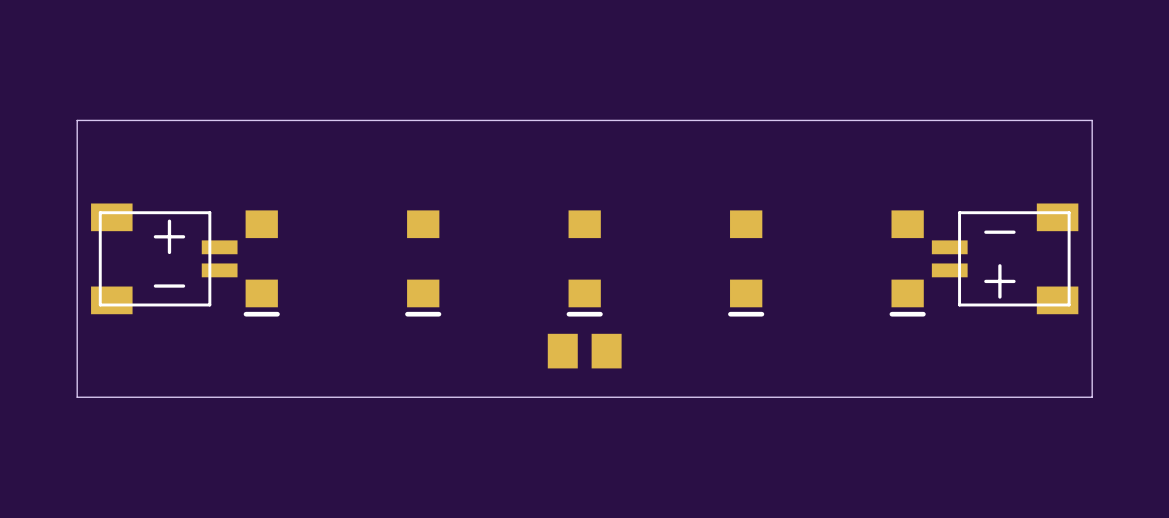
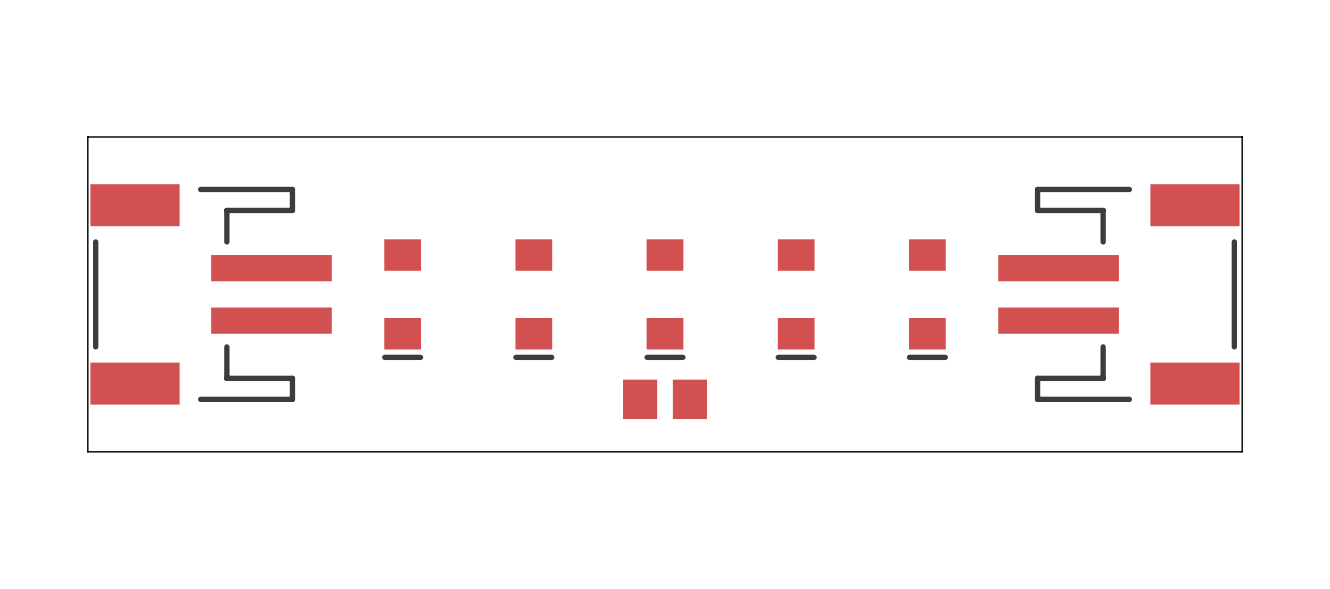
part footprint: [91, 203, 238, 315] -> [90, 184, 332, 405]
part footprint: [931, 203, 1079, 315] -> [998, 184, 1240, 405]
text: - (999, 232) -> none
text: + (169, 236) -> none
part: (261, 263) -> none
part: none -> (402, 299)
part: (423, 263) -> none
part: none -> (533, 299)
part: none -> (796, 299)
part: (746, 263) -> none
part: none -> (927, 299)
part: (907, 263) -> none
text: + (999, 281) -> none
text: - (169, 286) -> none

